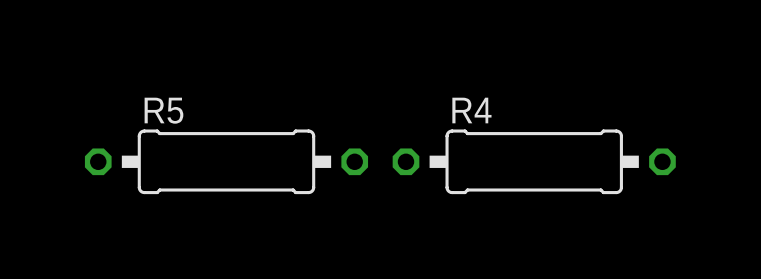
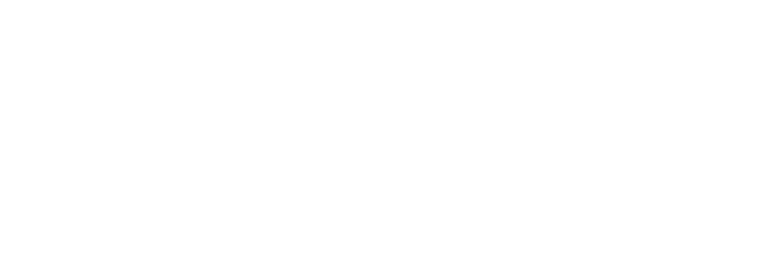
R5: (226, 161) -> none
R4: (534, 161) -> none

